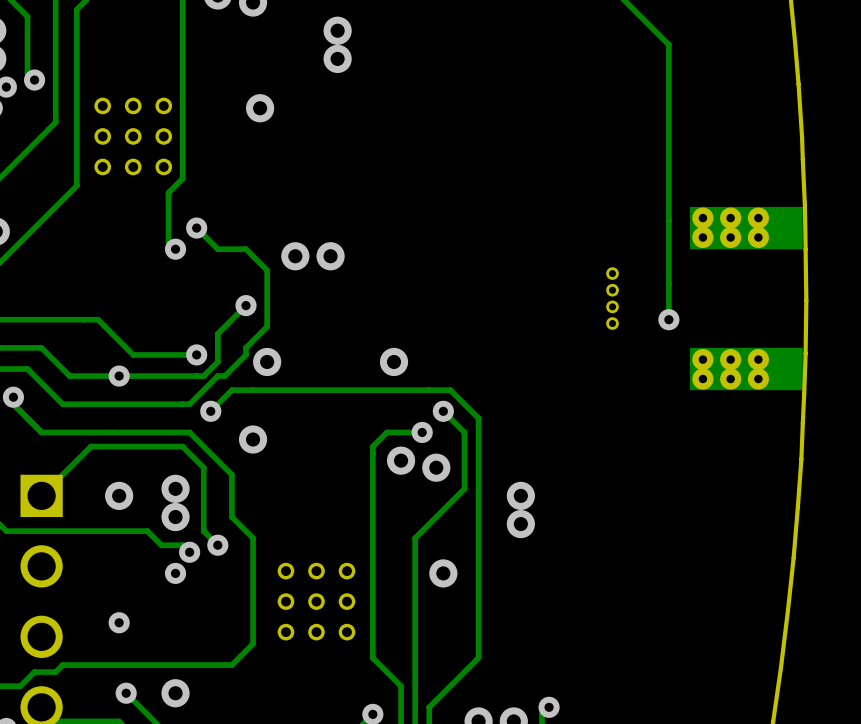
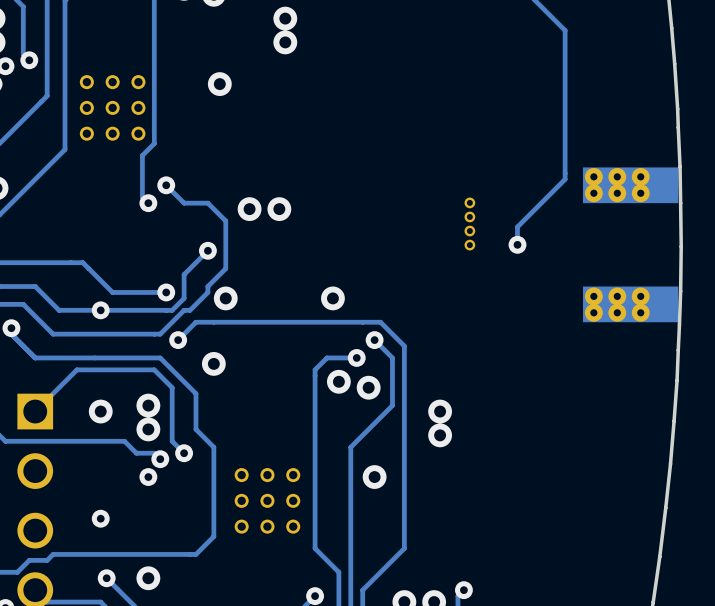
track: (668, 221) (668, 319) -> (565, 179) (517, 226) (517, 244)
part position: (612, 298) -> (469, 224)
via position: (668, 319) -> (517, 244)

